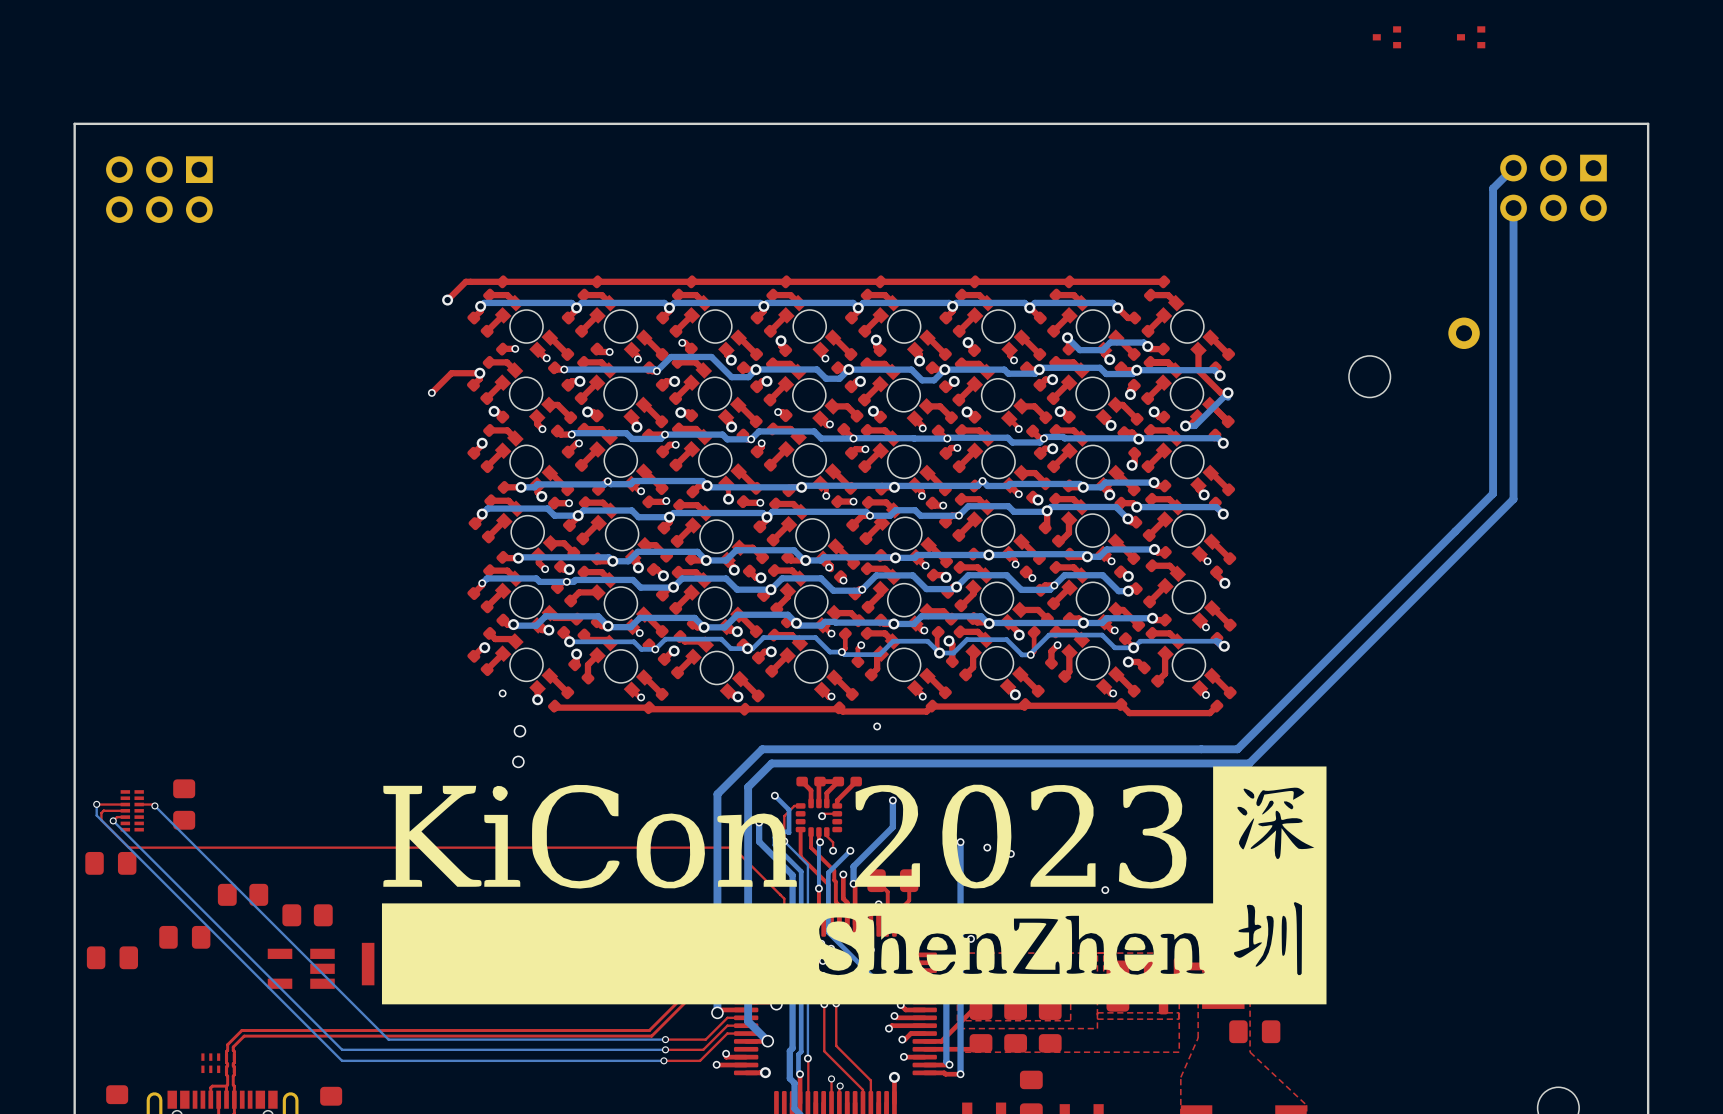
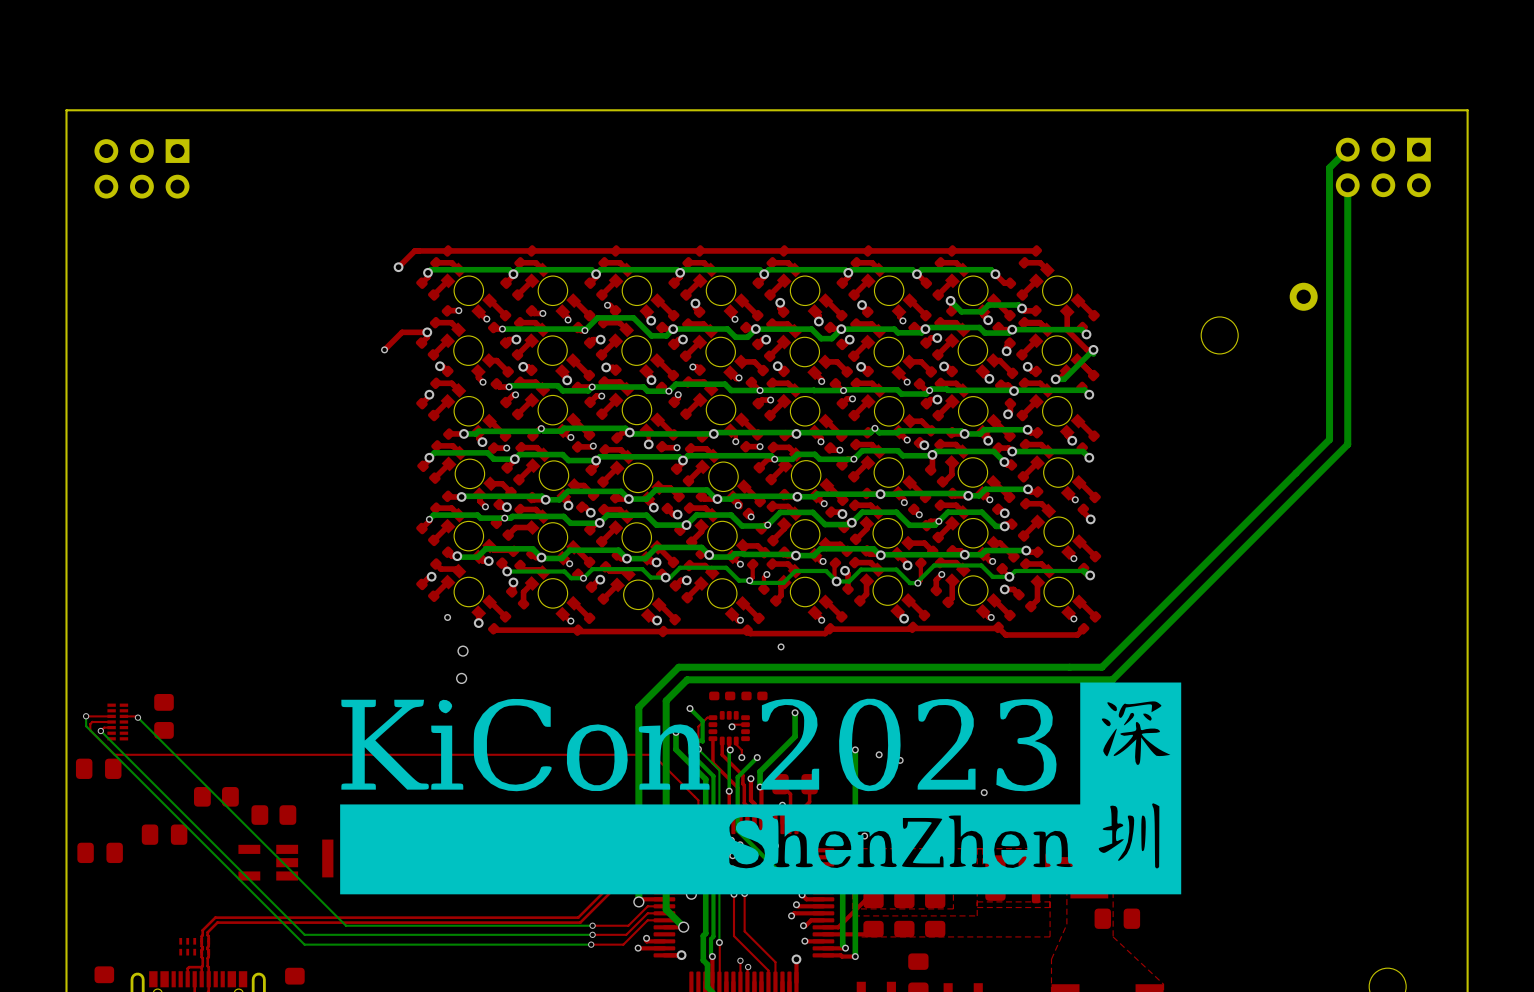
part: (1386, 37) -> none
part: (1471, 37) -> none
top track: (802, 781) (811, 790) (811, 803) -> none
top track: (856, 781) (837, 800) (837, 805) -> none
top track: (826, 803) (826, 793) (838, 781) (818, 782) (818, 803) -> none

